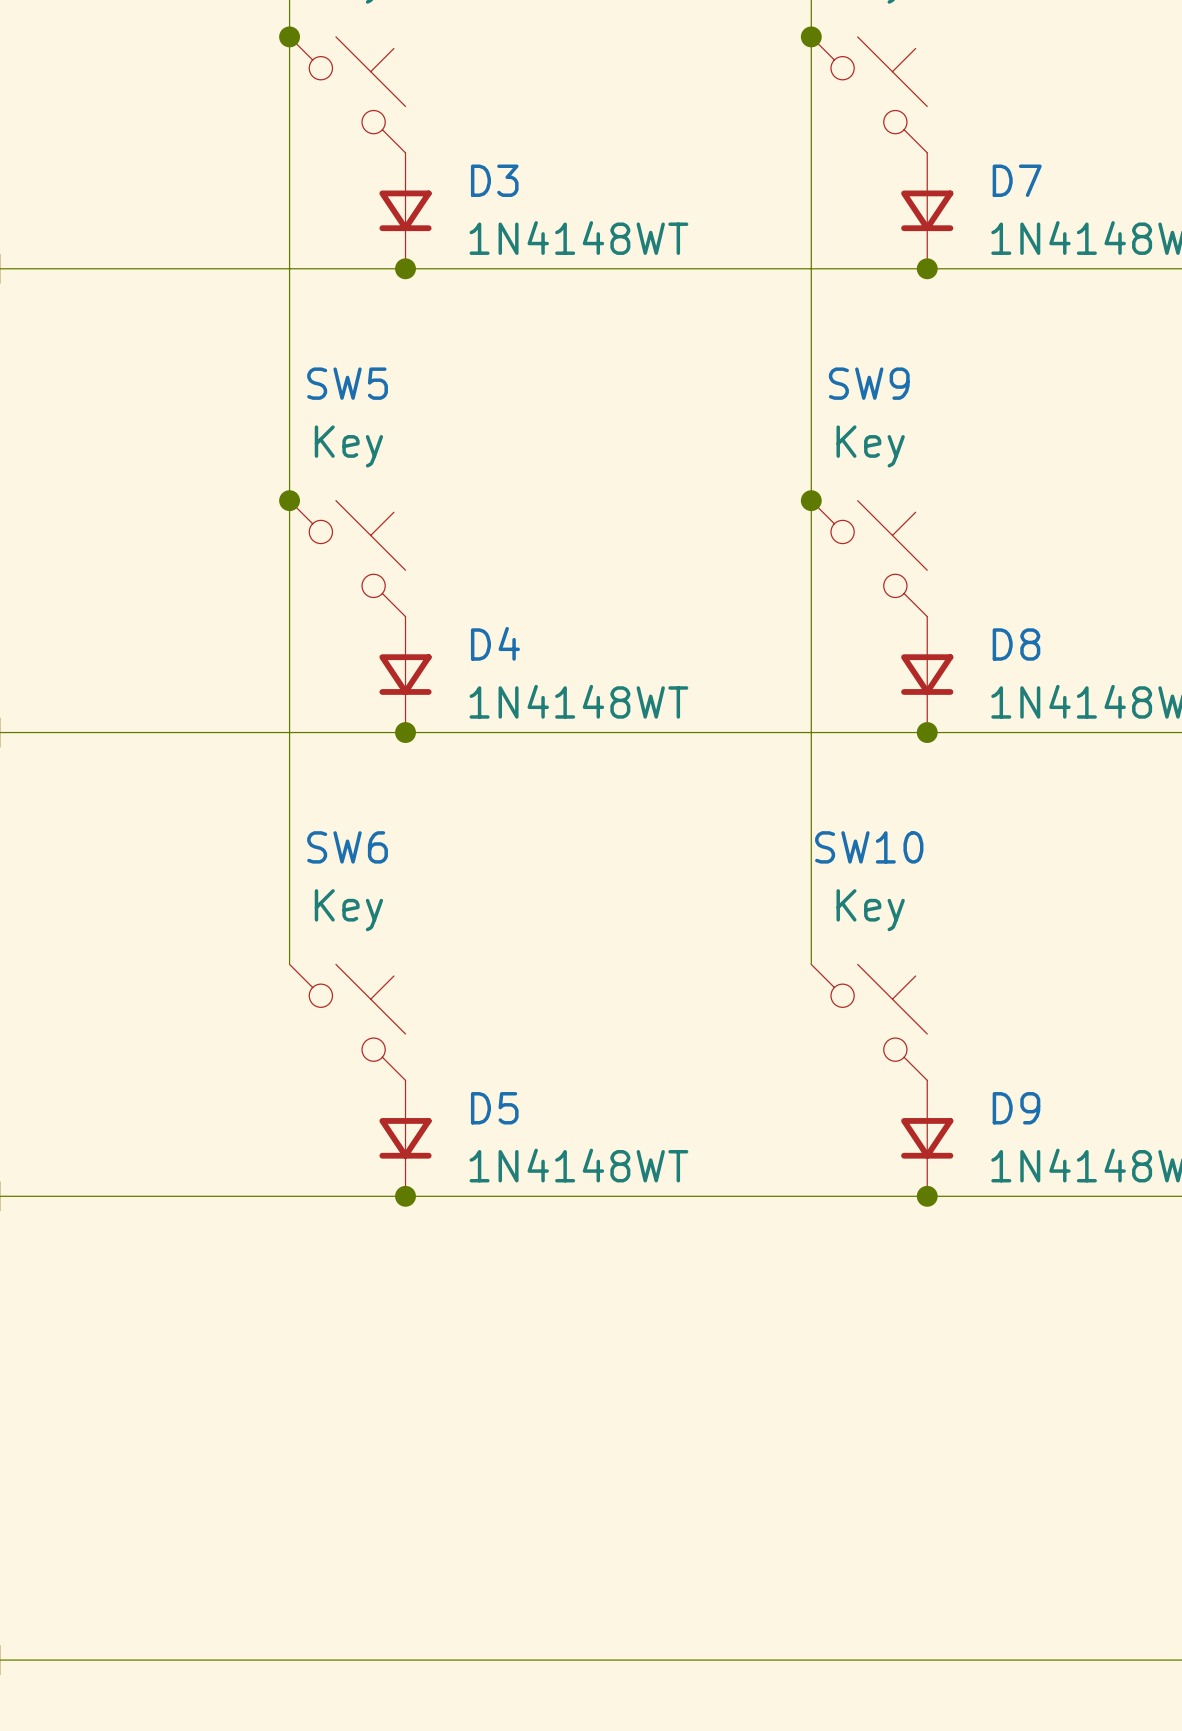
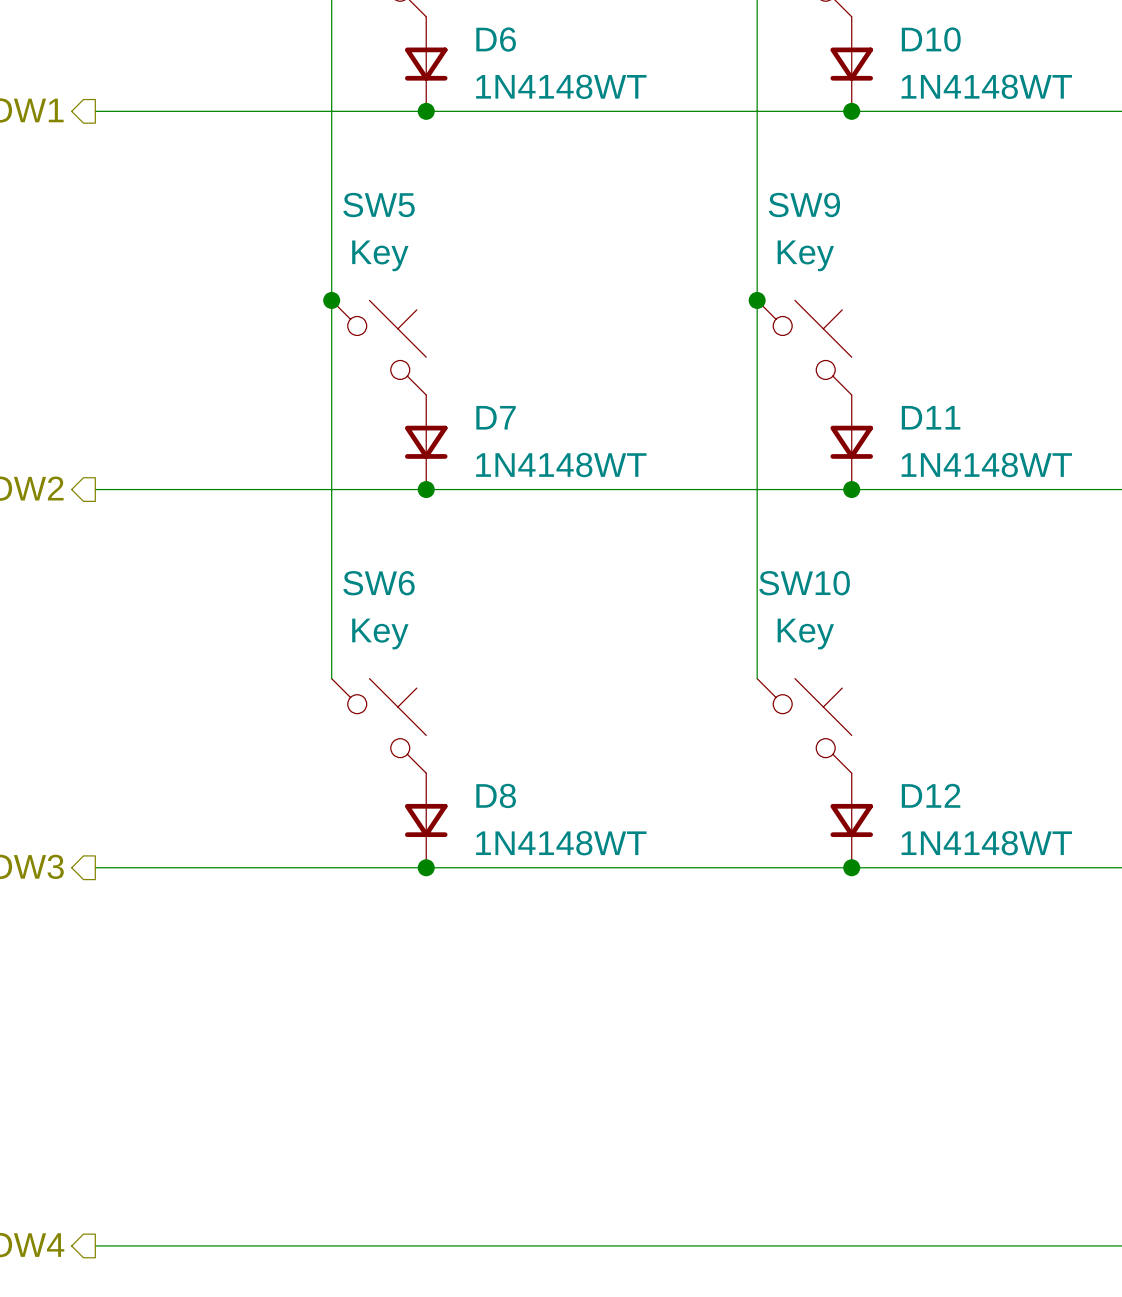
D3 name: D3 (494, 180) -> D6 (496, 39)
D7 name: D7 (1017, 180) -> D10 (931, 39)
D4 name: D4 (495, 643) -> D7 (496, 417)
D8 name: D8 (1016, 644) -> D11 (931, 417)
D5 name: D5 (494, 1108) -> D8 (496, 795)
D9 name: D9 (1016, 1108) -> D12 (931, 795)

